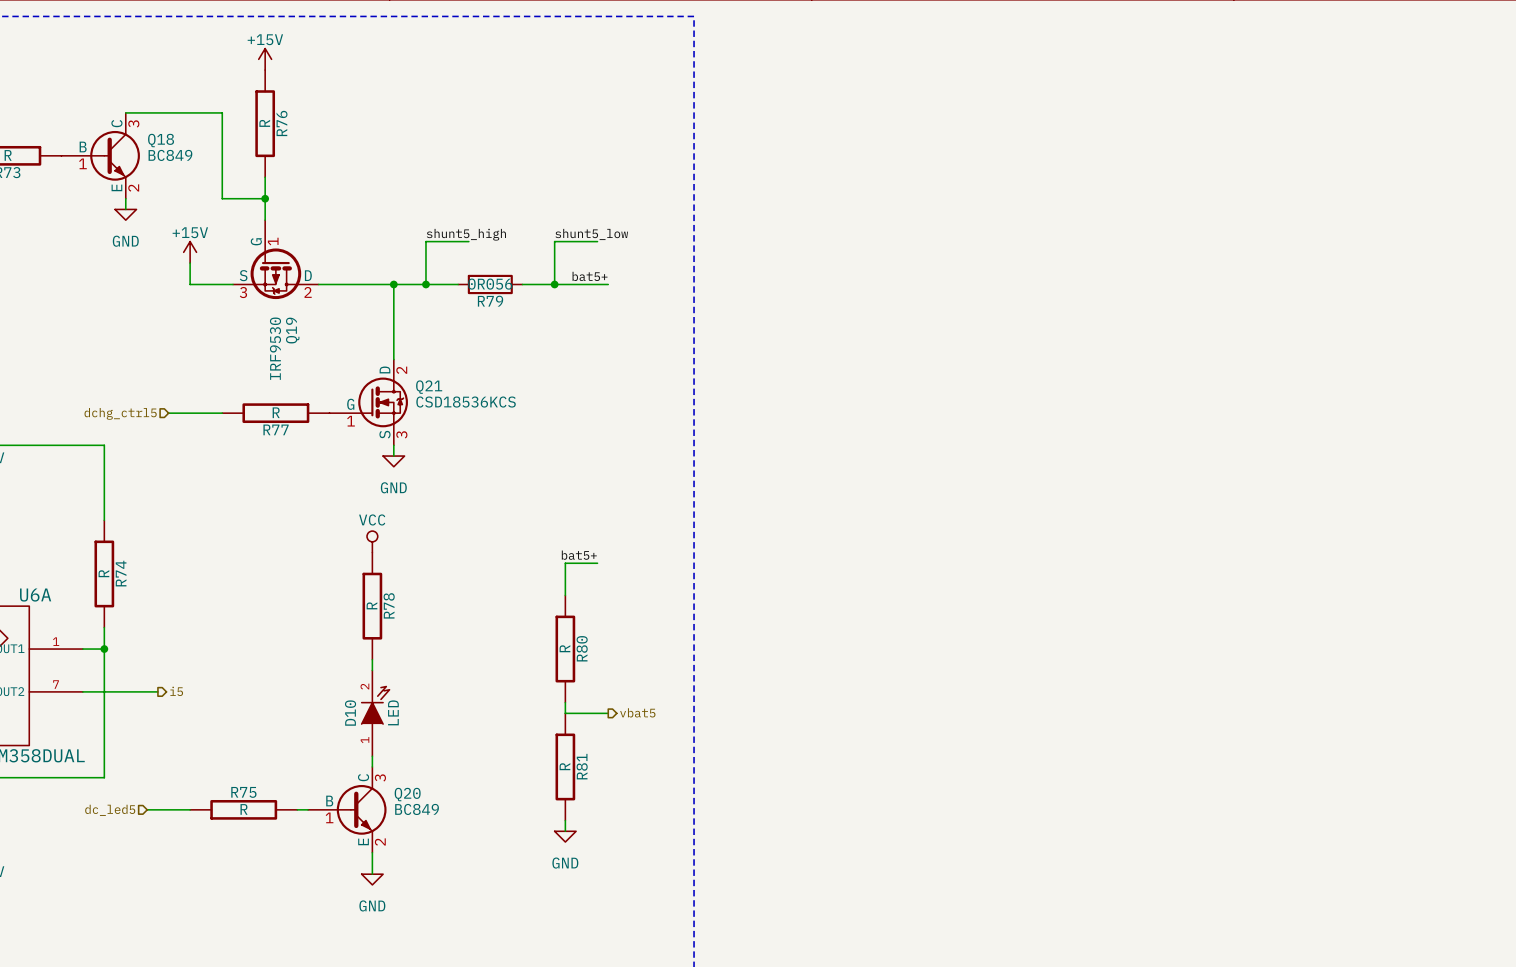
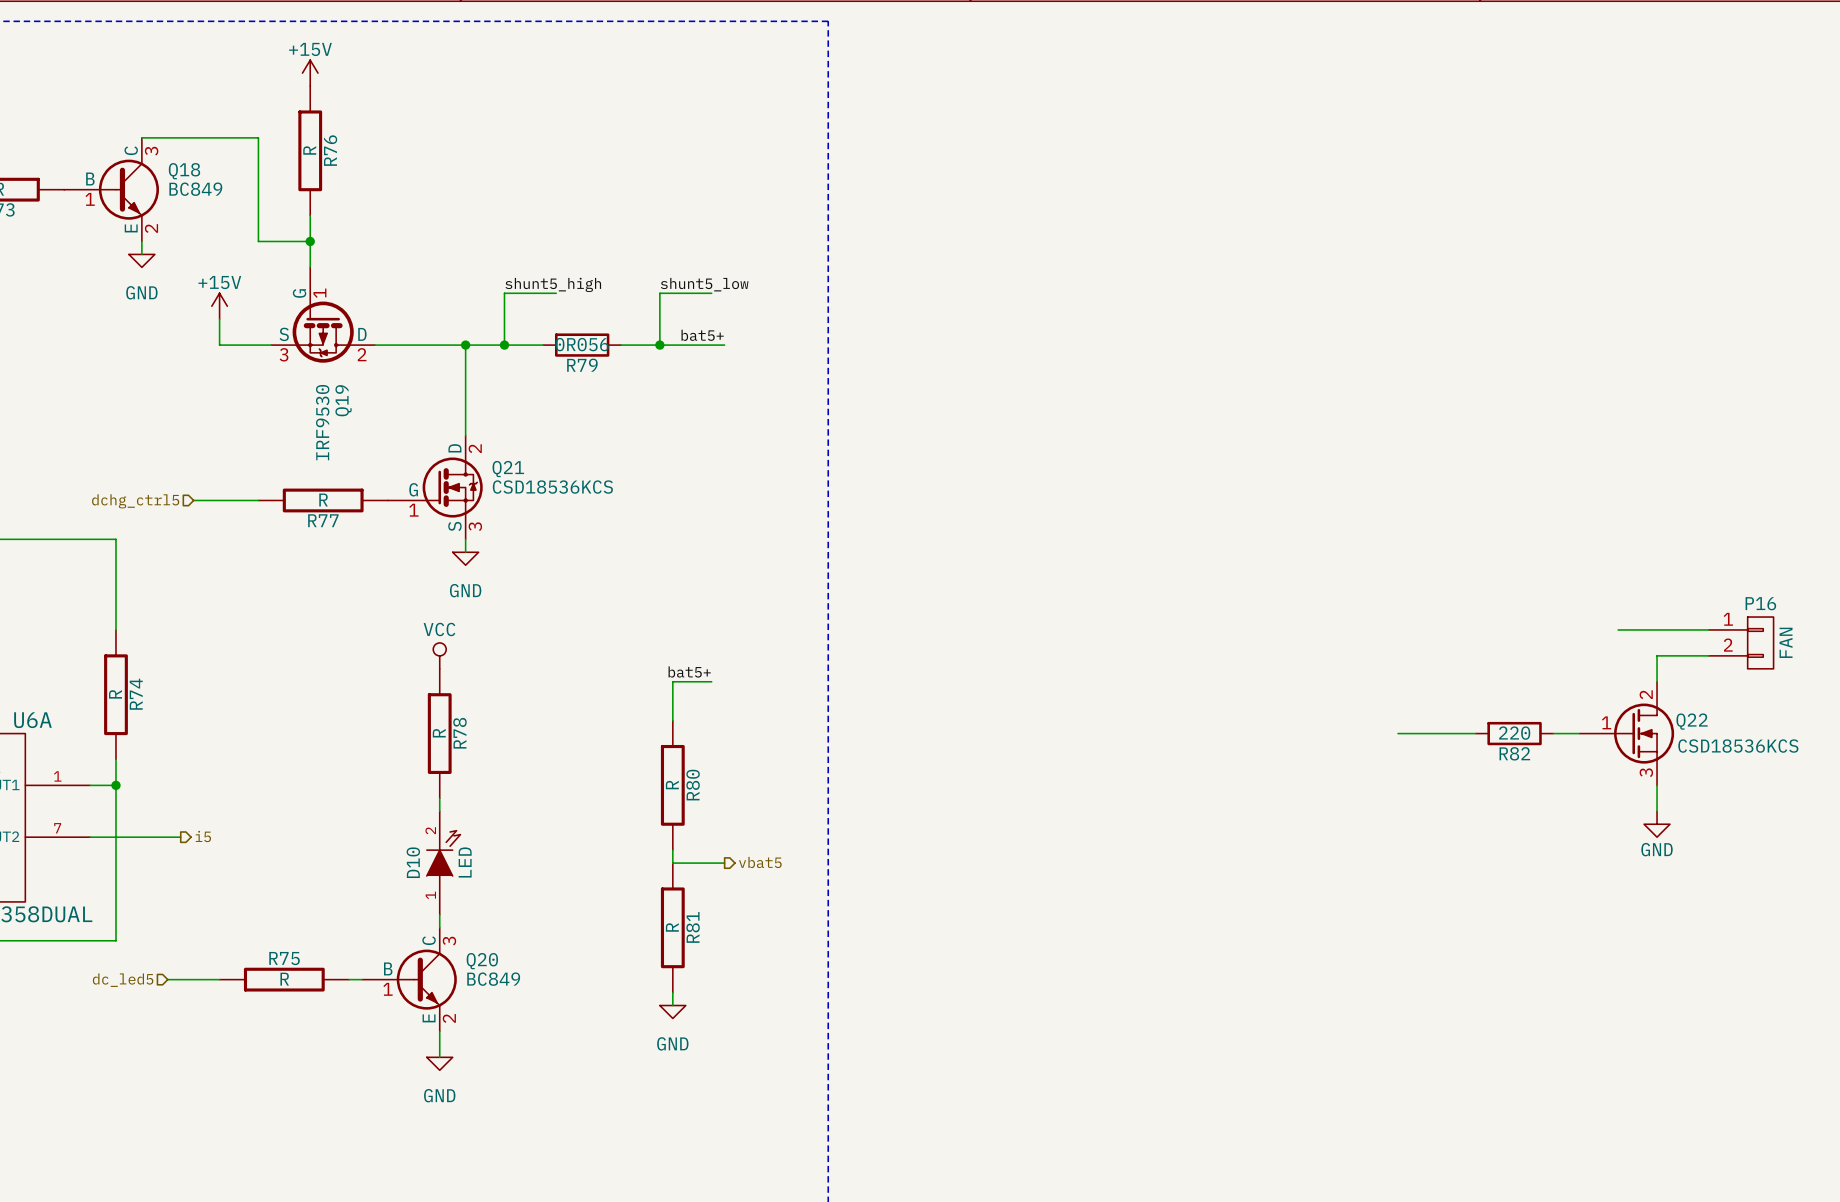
wire: none -> (1618, 629) (1708, 629)
P16: none -> FAN (1741, 642)
wire: none -> (1708, 655) (1657, 655) (1657, 681)
wire: none -> (1398, 733) (1475, 733)
R82: none -> 220 (1514, 733)
wire: none -> (1553, 733) (1579, 733)
Q22: none -> CSD18536KCS (1626, 733)
wire: none -> (1657, 785) (1657, 811)
power symbol: none -> GND (1657, 824)

